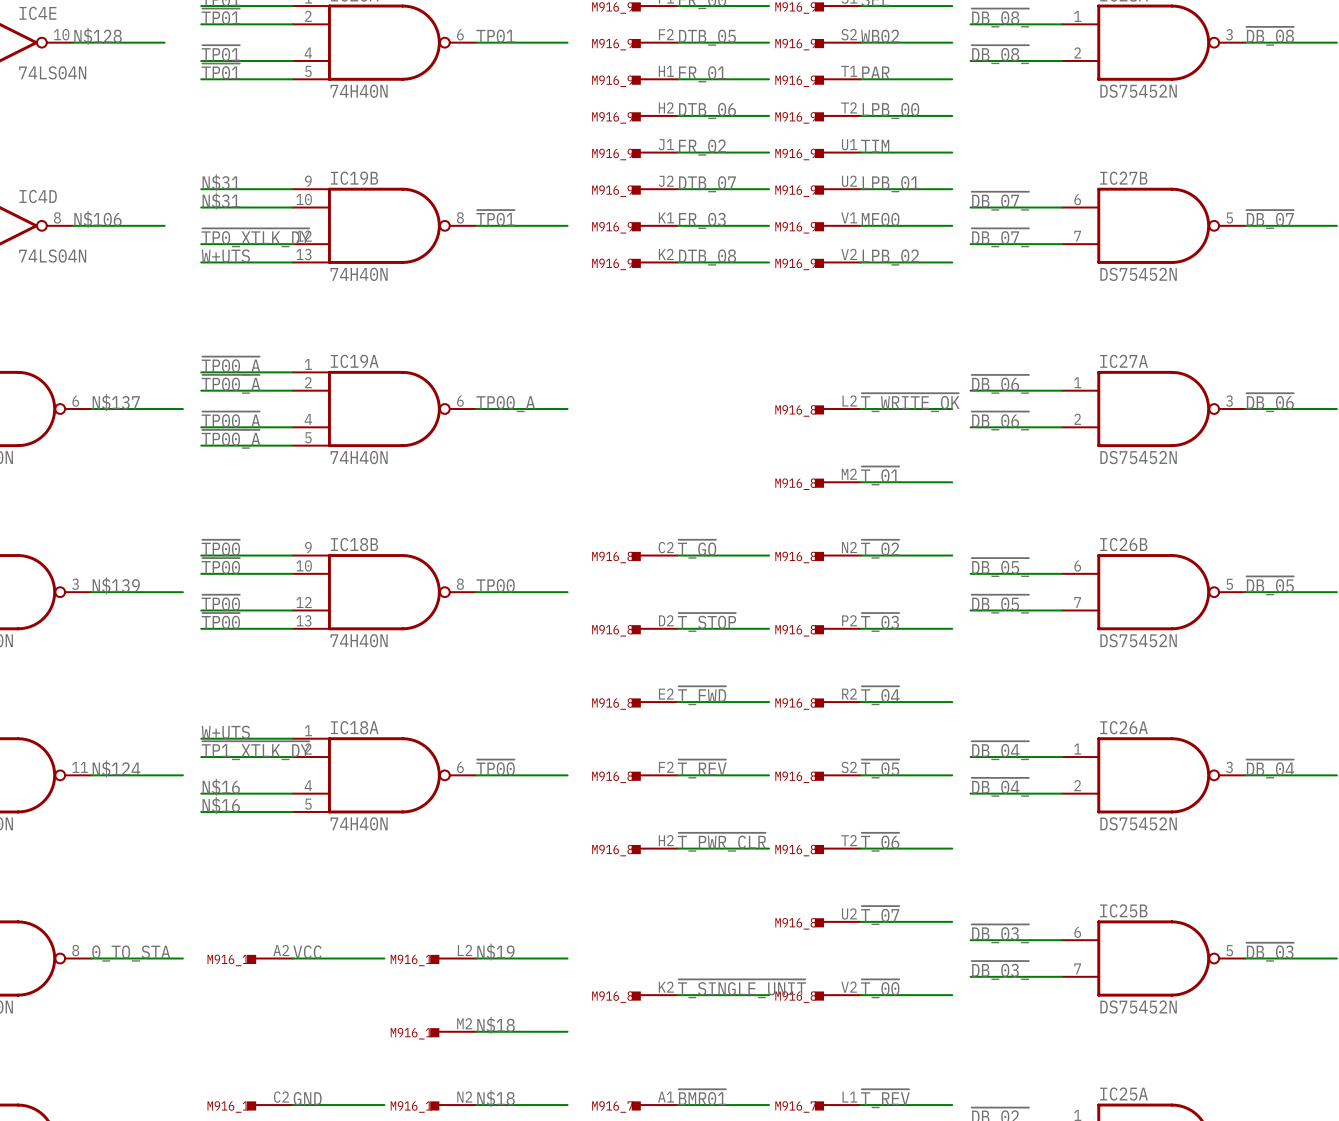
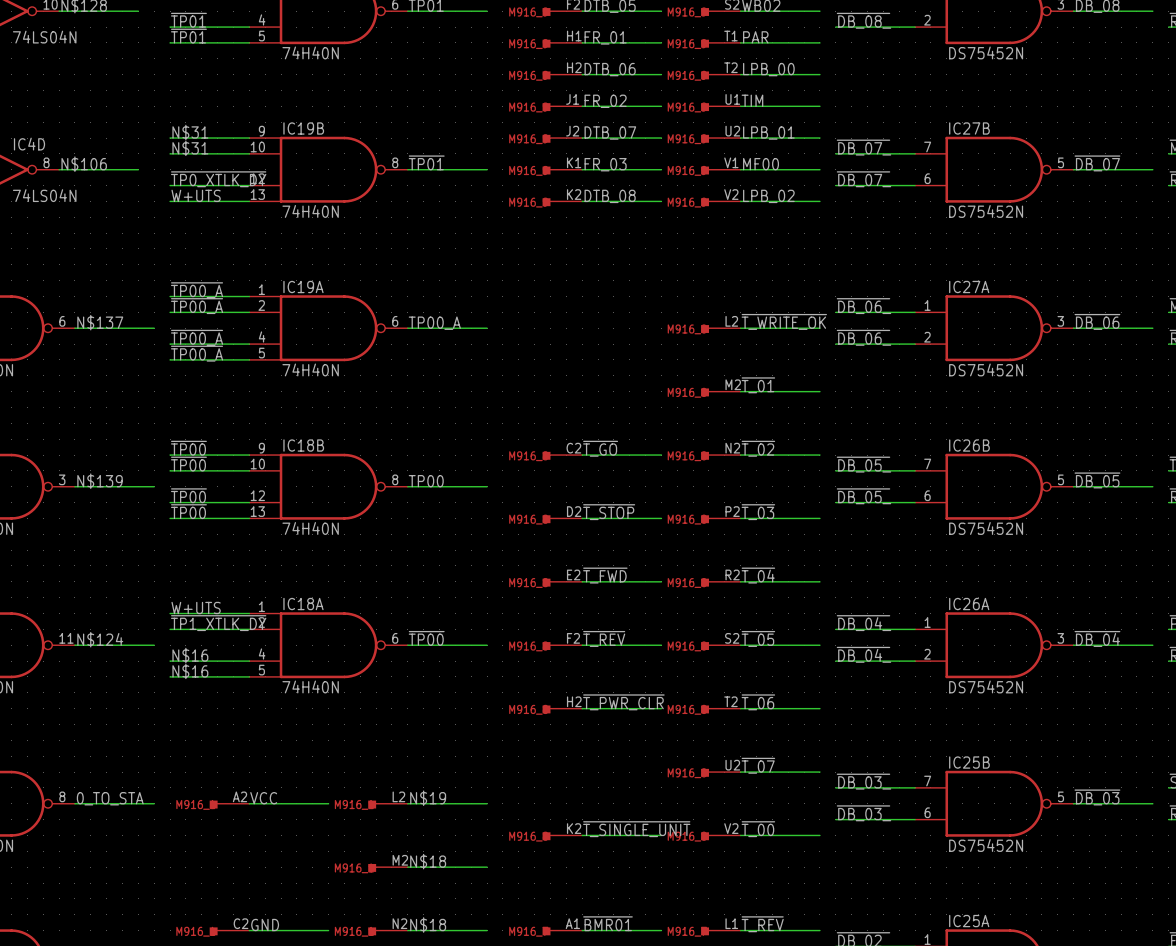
IC27B flip: as is (1153, 225) -> up-down (994, 169)
IC26B flip: as is (1153, 592) -> up-down (994, 486)
IC25B flip: as is (1153, 958) -> up-down (994, 803)

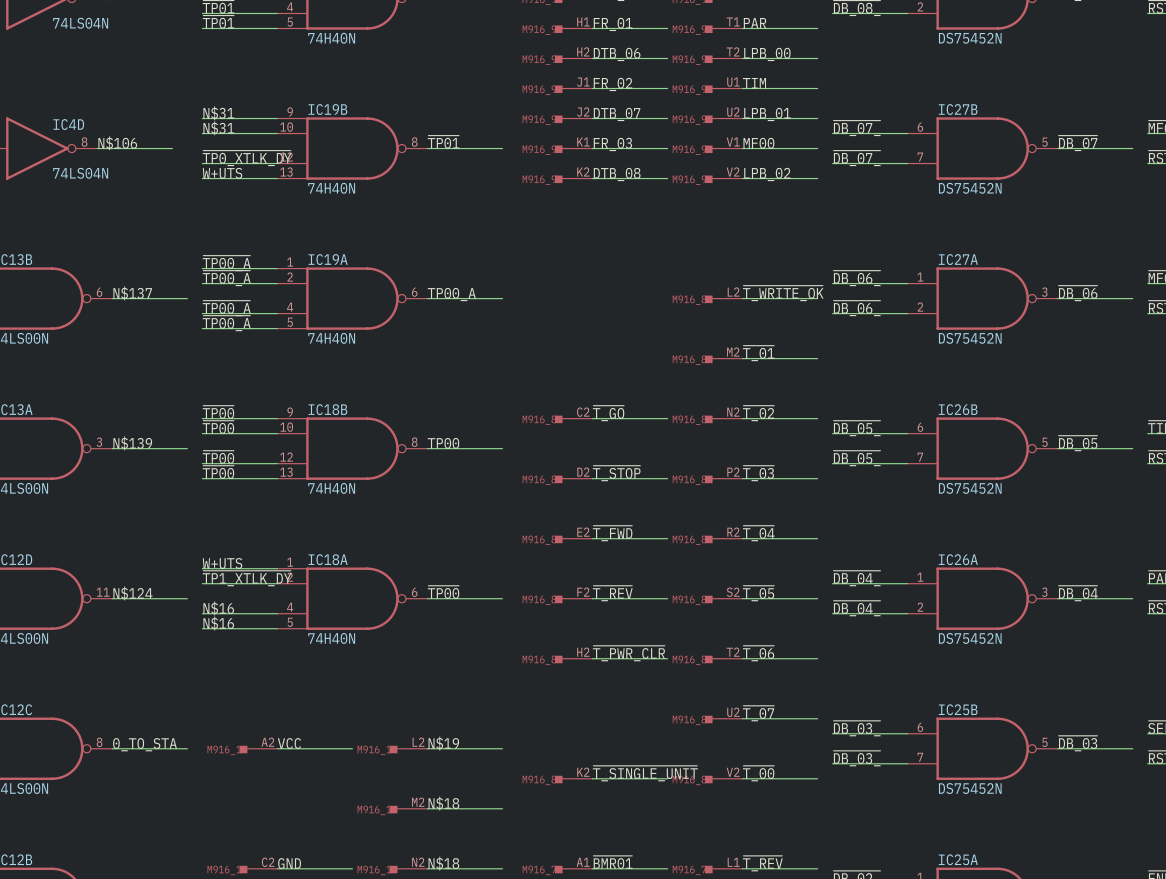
IC27B flip: as is (994, 169) -> up-down (982, 148)
IC26B flip: as is (994, 486) -> up-down (982, 448)
IC25B flip: as is (994, 803) -> up-down (982, 748)

